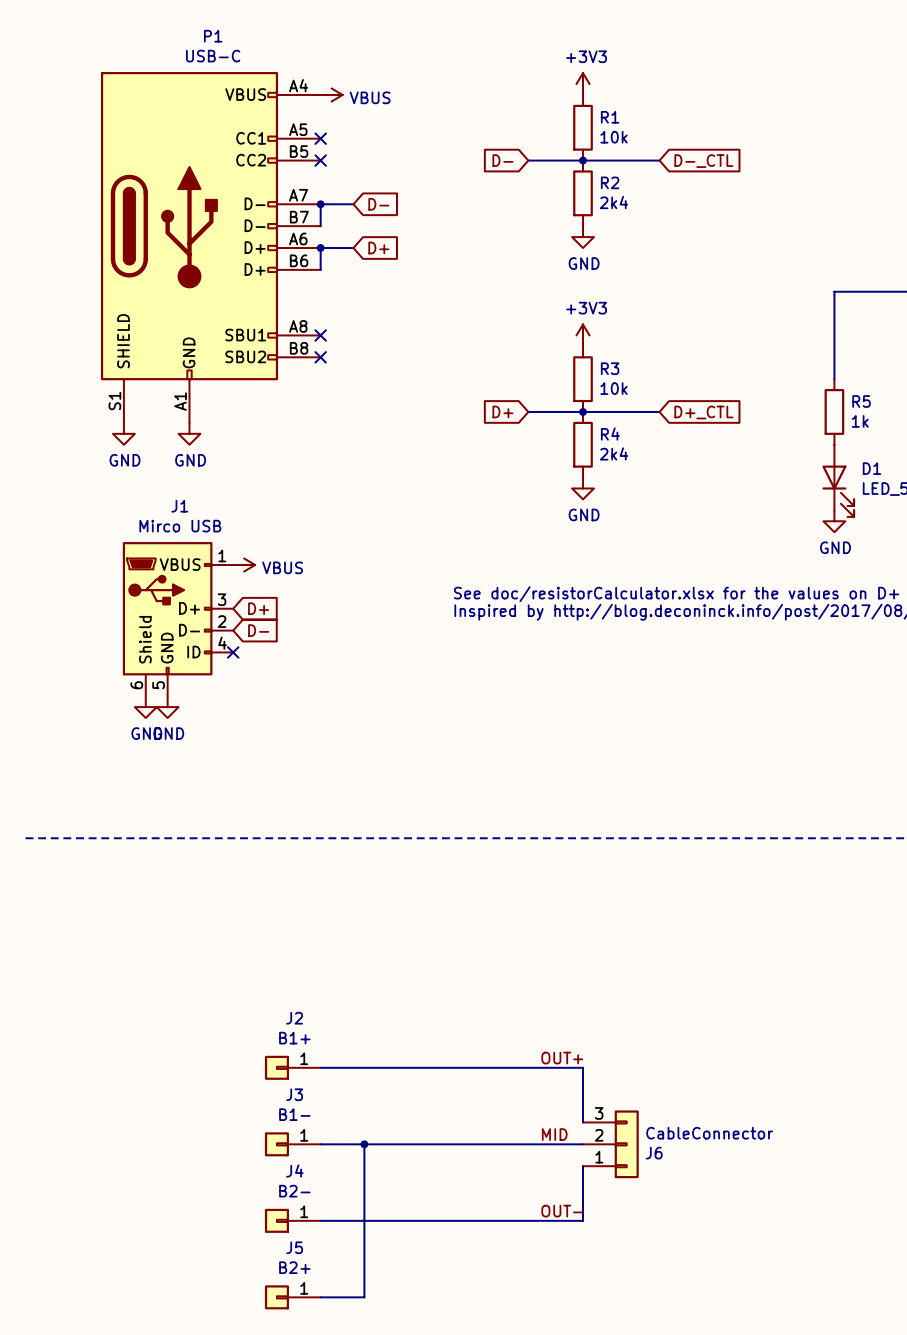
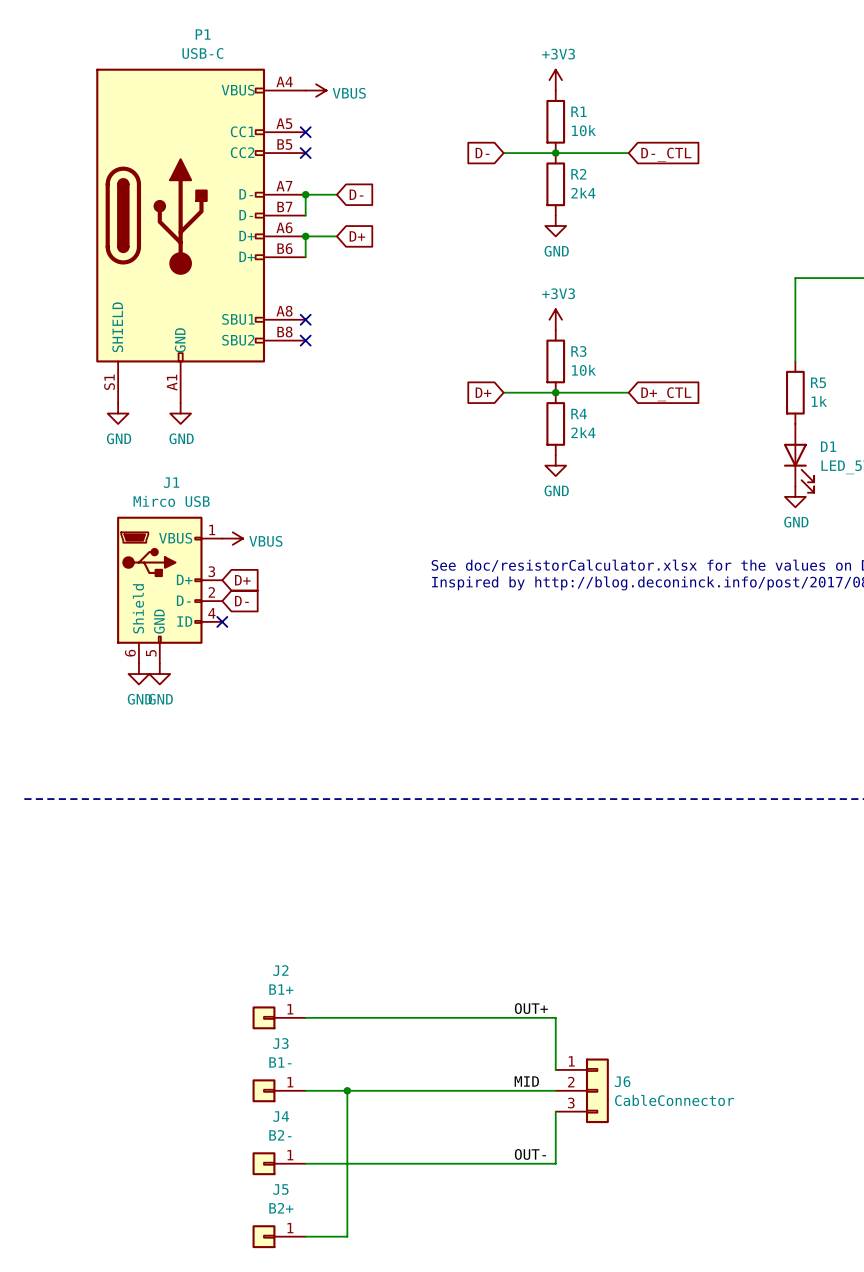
J6 flip: as is (626, 1144) -> up-down (597, 1090)

